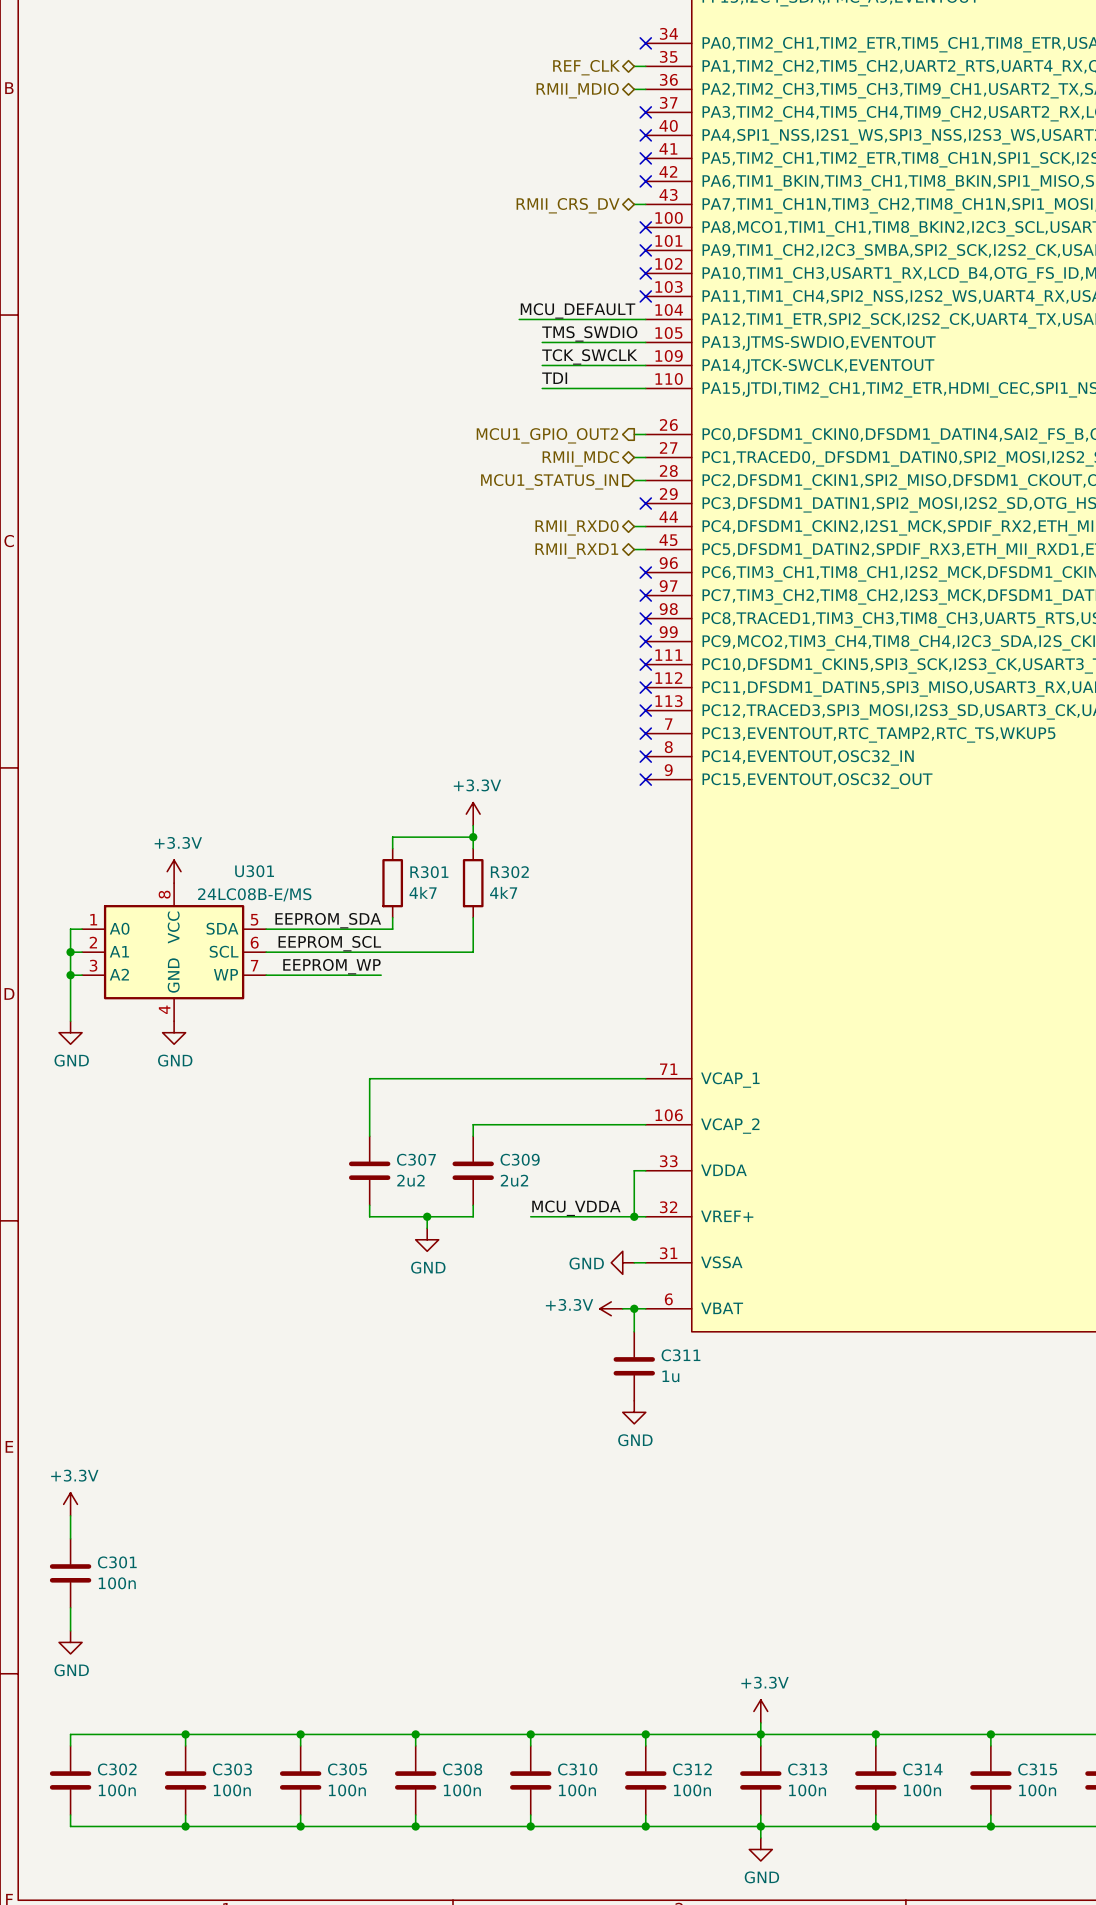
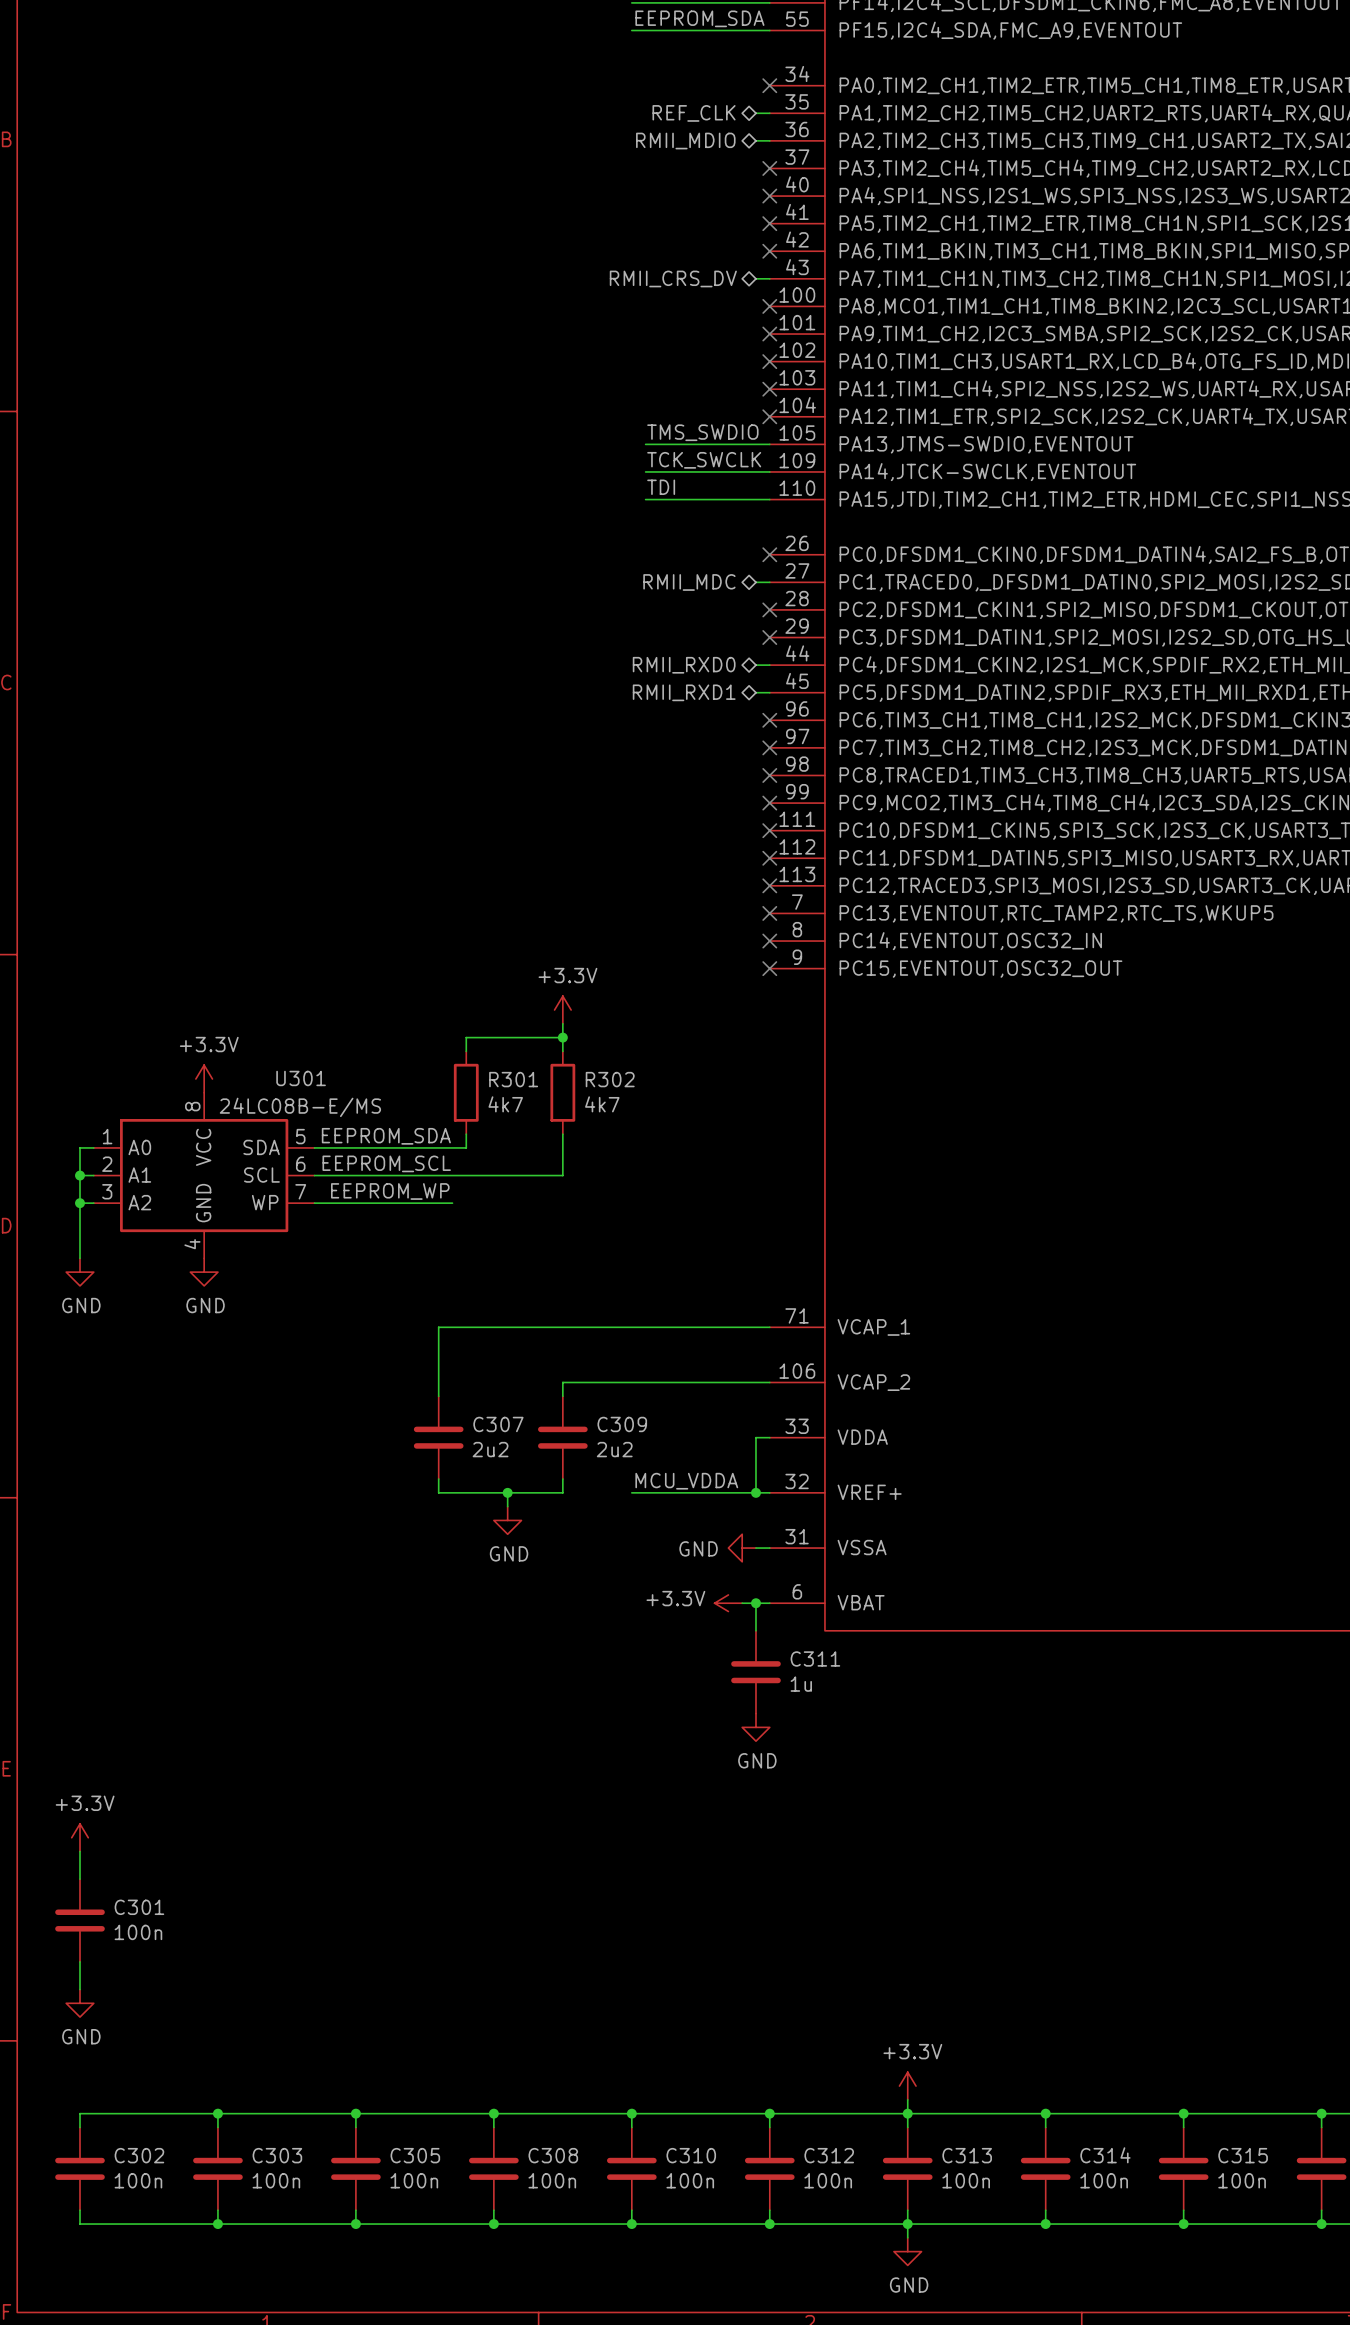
label: MCU_DEFAULT (578, 310) -> none
wire: (519, 319) (645, 319) -> none
no-connect mark: none -> (769, 416)
wire: (634, 434) (645, 434) -> none
no-connect mark: none -> (769, 554)
hierarchical label: MCU1_GPIO_OUT2 (547, 435) -> none
wire: (634, 480) (645, 480) -> none
no-connect mark: none -> (769, 609)
hierarchical label: MCU1_STATUS_IN (549, 481) -> none

